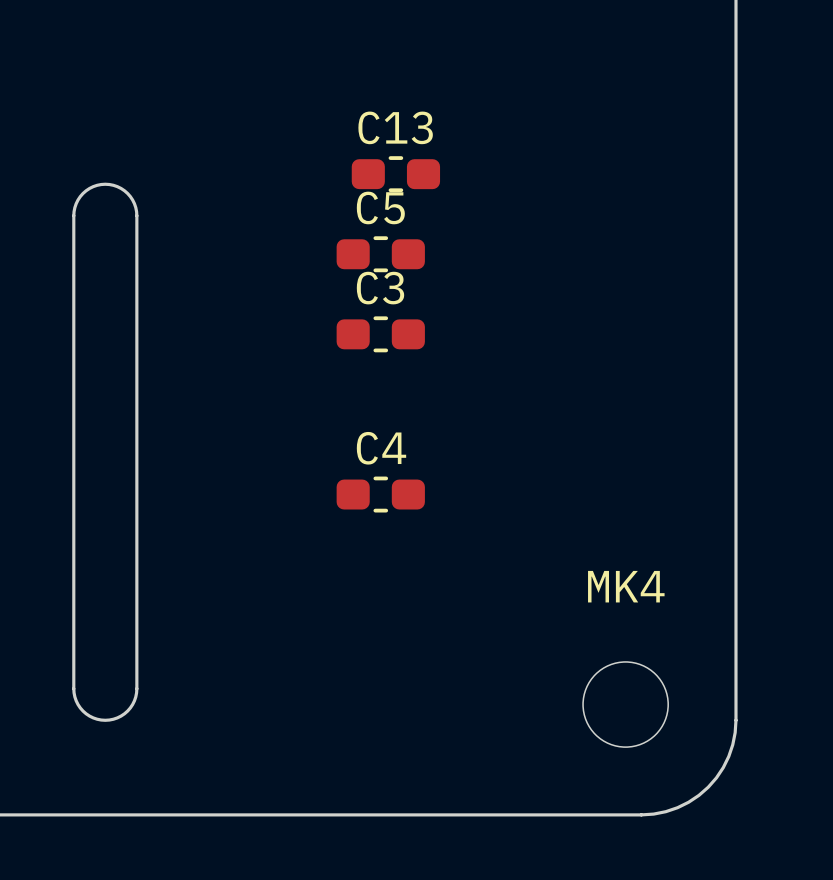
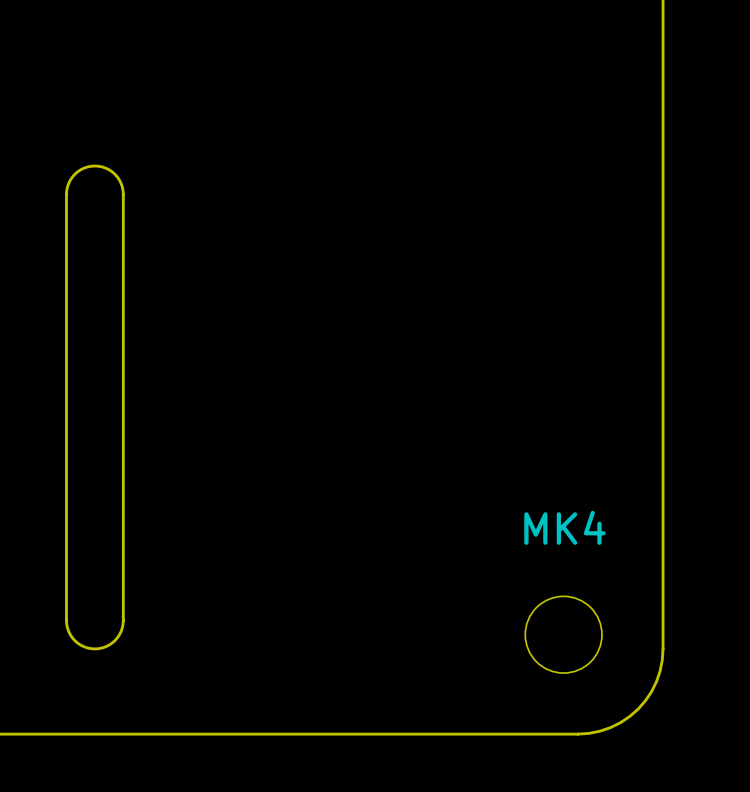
C13: (395, 174) -> none
C5: (380, 254) -> none
C3: (380, 334) -> none
C4: (380, 494) -> none

